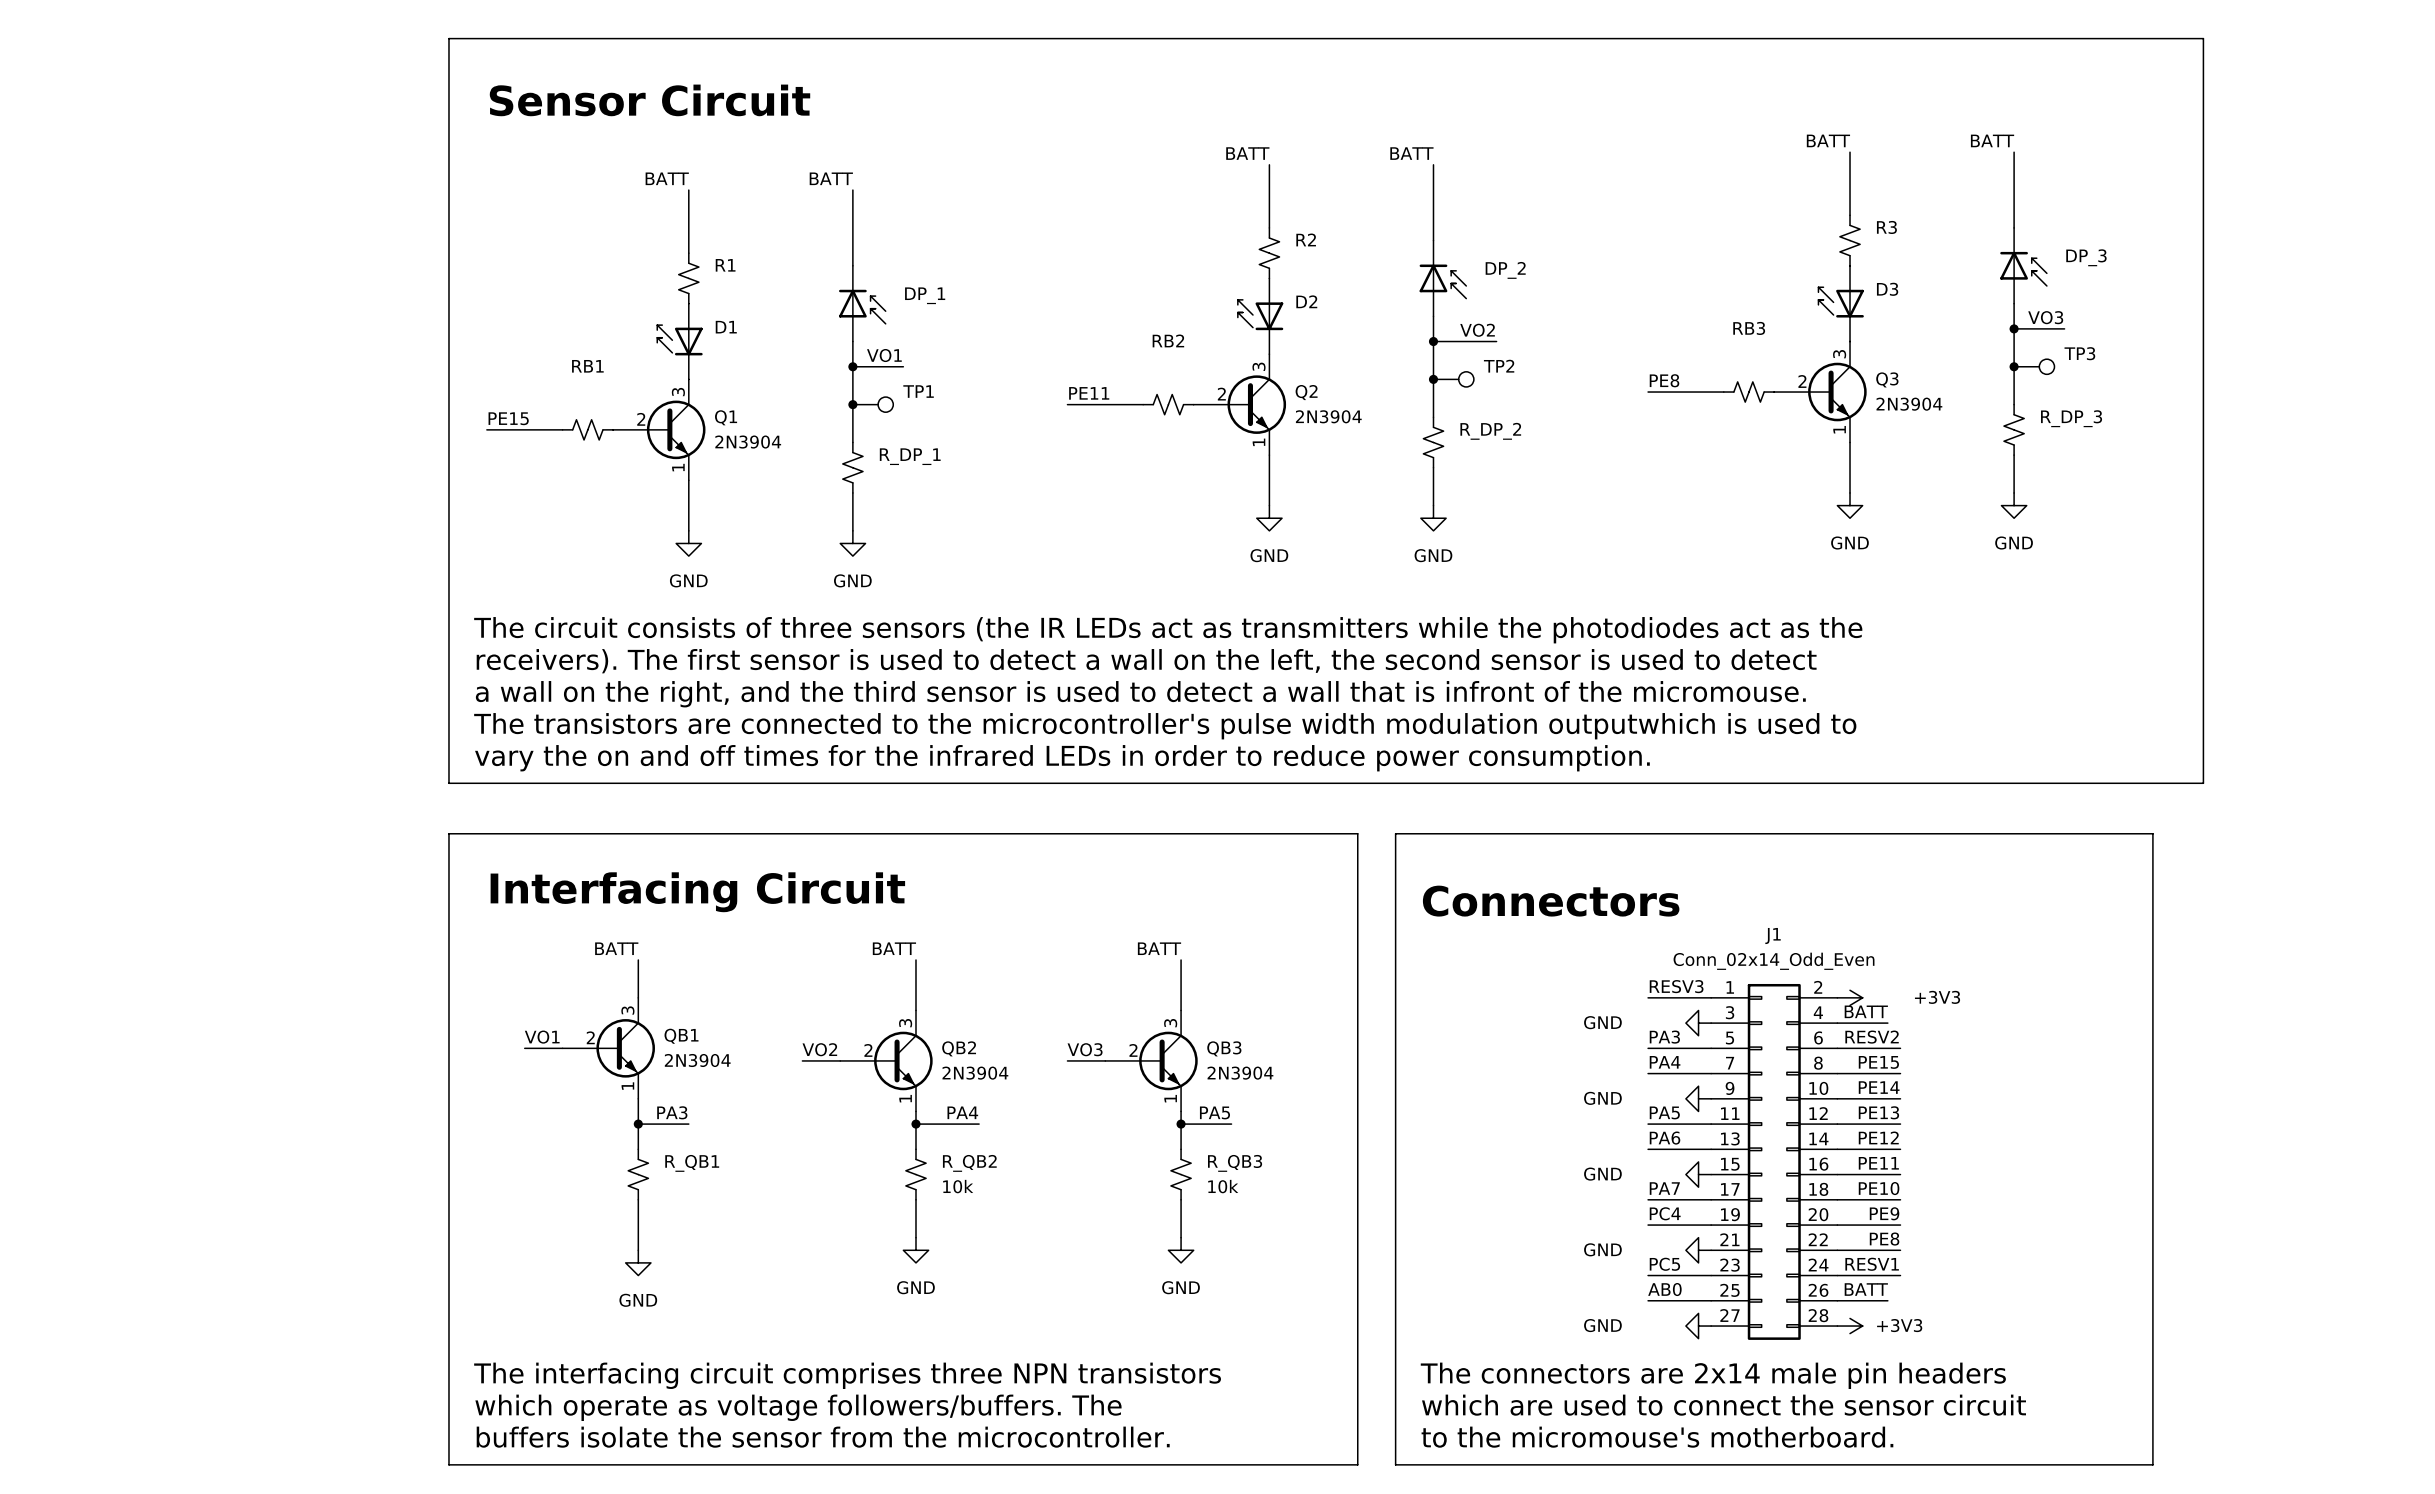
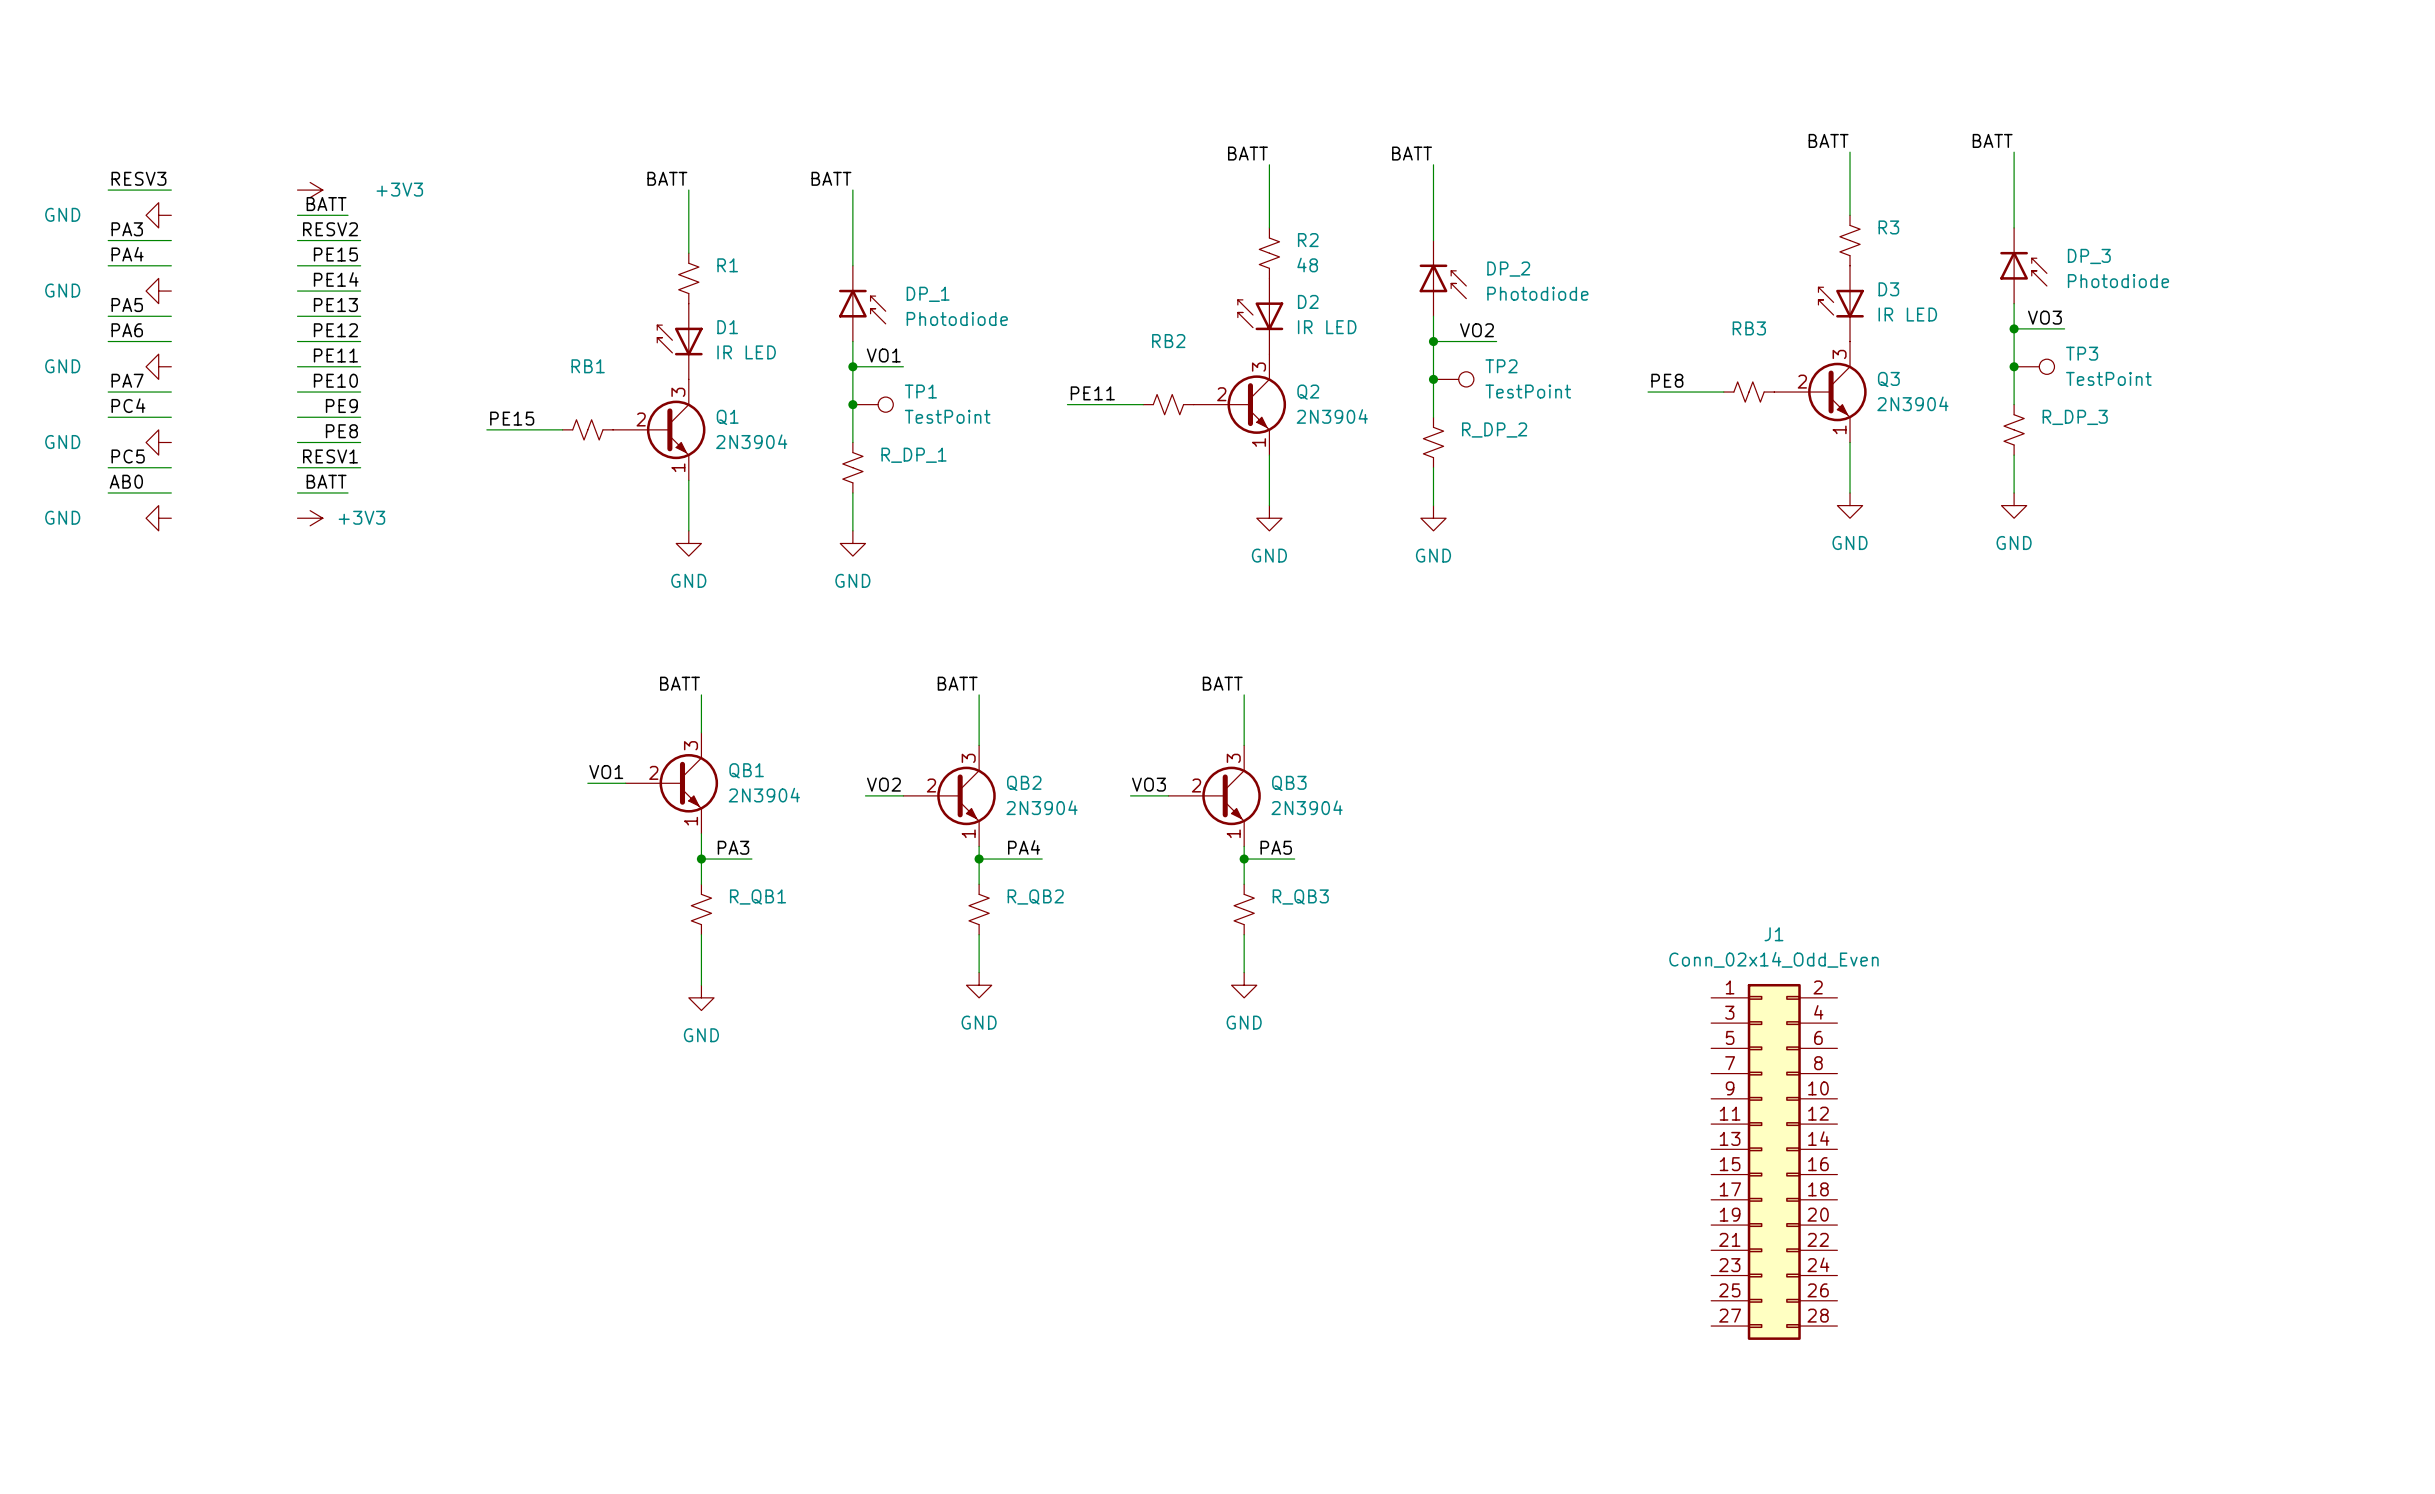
line: (448, 38) (2203, 38) (2203, 783) (448, 783) (448, 38) -> none
text: Sensor Circuit (649, 100) -> none
label: none -> RESV3 (138, 178)
wire: none -> (108, 190) (171, 190)
power symbol: none -> +3V3 (310, 190)
label: none -> BATT (326, 204)
power symbol: none -> GND (158, 215)
wire: none -> (297, 215) (348, 215)
label: none -> PA3 (127, 229)
label: none -> RESV2 (330, 229)
wire: none -> (108, 240) (171, 240)
wire: none -> (297, 240) (360, 240)
label: none -> PA4 (127, 254)
label: none -> PE15 (335, 254)
wire: none -> (108, 265) (171, 265)
wire: none -> (297, 265) (360, 265)
R2 value: none -> 48 (1307, 265)
label: none -> PE14 (336, 279)
DP_3 value: none -> Photodiode (2118, 281)
power symbol: none -> GND (158, 291)
wire: none -> (297, 291) (360, 291)
DP_2 value: none -> Photodiode (1537, 293)
label: none -> PA5 (127, 305)
label: none -> PE13 (335, 305)
D3 value: none -> IR LED (1907, 314)
wire: none -> (108, 316) (171, 316)
wire: none -> (297, 316) (360, 316)
DP_1 value: none -> Photodiode (957, 318)
D2 value: none -> IR LED (1327, 327)
label: none -> PA6 (127, 330)
label: none -> PE12 (335, 330)
wire: none -> (108, 341) (171, 341)
wire: none -> (297, 341) (360, 341)
D1 value: none -> IR LED (746, 352)
label: none -> PE11 (335, 355)
power symbol: none -> GND (158, 366)
wire: none -> (297, 366) (360, 366)
TP3 value: none -> TestPoint (2108, 378)
label: none -> PA7 (127, 380)
label: none -> PE10 (335, 380)
TP2 value: none -> TestPoint (1528, 391)
wire: none -> (108, 392) (171, 392)
wire: none -> (297, 392) (360, 392)
label: none -> PC4 (128, 405)
label: none -> PE9 (341, 405)
TP1 value: none -> TestPoint (947, 416)
wire: none -> (108, 417) (171, 417)
wire: none -> (297, 417) (360, 417)
label: none -> PE8 (341, 431)
power symbol: none -> GND (158, 442)
wire: none -> (297, 442) (360, 442)
label: none -> PC5 (128, 456)
label: none -> RESV1 (330, 456)
wire: none -> (108, 467) (171, 467)
wire: none -> (297, 467) (360, 467)
label: none -> AB0 (126, 481)
label: none -> BATT (326, 481)
wire: none -> (108, 492) (171, 492)
wire: none -> (297, 492) (348, 492)
power symbol: none -> GND (158, 518)
power symbol: none -> +3V3 (310, 518)
text: The circuit consists of three sensors (the IR LEDs act as transmitters while the photodiodes act as the (1168, 630) -> none
text: receivers). The first sensor is used to detect a wall on the left, the second sensor is used to detect (1146, 661) -> none
label: none -> BATT (679, 683)
label: none -> BATT (957, 683)
label: none -> BATT (1222, 683)
wire: none -> (701, 694) (701, 732)
wire: none -> (979, 694) (979, 745)
text: a wall on the right, and the third sensor is used to detect a wall that is infront of the micromouse. (1140, 694) -> none
wire: none -> (1244, 694) (1244, 745)
text: The transistors are connected to the microcontroller's pulse width modulation outputwhich is used to (1165, 726) -> none
text: vary the on and off times for the infrared LEDs in order to reduce power consumption. (1062, 758) -> none
label: none -> VO1 (606, 772)
label: none -> VO2 (883, 784)
label: none -> VO3 (1148, 784)
wire: none -> (865, 795) (903, 795)
wire: none -> (1130, 795) (1168, 795)
line: (448, 833) (1357, 833) (1357, 1464) (448, 1464) (448, 833) -> none
wire: none -> (701, 833) (701, 884)
line: (1395, 833) (2152, 833) (2152, 1464) (1395, 1464) (1395, 833) -> none
wire: none -> (979, 846) (979, 884)
wire: none -> (1244, 846) (1244, 884)
label: none -> PA3 (733, 847)
label: none -> PA4 (1024, 847)
label: none -> PA5 (1276, 847)
wire: none -> (701, 859) (751, 859)
junction: none -> (701, 859)
wire: none -> (979, 859) (1042, 859)
junction: none -> (979, 859)
wire: none -> (1244, 859) (1294, 859)
junction: none -> (1244, 859)
text: Interfacing Circuit (697, 892) -> none
text: Connectors (1551, 901) -> none
label: BATT (616, 948) -> none
label: BATT (894, 948) -> none
label: BATT (1159, 948) -> none
wire: (638, 959) (638, 997) -> none
wire: (915, 959) (915, 1010) -> none
wire: (1181, 959) (1181, 1010) -> none
power symbol: none -> GND (979, 985)
power symbol: none -> GND (1244, 985)
label: RESV3 (1676, 986) -> none
power symbol: none -> GND (701, 997)
wire: (1648, 997) (1711, 997) -> none
power symbol: +3V3 (1850, 997) -> none
label: BATT (1866, 1011) -> none
power symbol: GND (1698, 1023) -> none
wire: (1837, 1023) (1887, 1023) -> none
label: VO1 (542, 1037) -> none
label: PA3 (1664, 1037) -> none
label: RESV2 (1872, 1037) -> none
wire: (524, 1048) (562, 1048) -> none
QB1 position: (608, 1048) -> (671, 783)
wire: (1648, 1048) (1711, 1048) -> none
wire: (1837, 1048) (1900, 1048) -> none
label: VO2 (819, 1049) -> none
label: VO3 (1085, 1049) -> none
wire: (802, 1060) (840, 1060) -> none
QB2 position: (886, 1060) -> (949, 795)
wire: (1067, 1060) (1105, 1060) -> none
QB3 position: (1151, 1060) -> (1214, 795)
label: PA4 (1665, 1062) -> none
label: PE15 (1878, 1062) -> none
wire: (1648, 1073) (1711, 1073) -> none
wire: (1837, 1073) (1900, 1073) -> none
label: PE14 (1879, 1087) -> none
wire: (638, 1098) (638, 1149) -> (701, 934) (701, 985)
power symbol: GND (1698, 1098) -> none
wire: (1837, 1098) (1900, 1098) -> none
wire: (915, 1111) (915, 1149) -> (979, 934) (979, 972)
wire: (1181, 1111) (1181, 1149) -> (1244, 934) (1244, 972)
label: PA3 (672, 1112) -> none
label: PA4 (962, 1112) -> none
label: PA5 (1214, 1112) -> none
label: PA5 (1664, 1112) -> none
label: PE13 (1878, 1112) -> none
wire: (638, 1124) (688, 1124) -> none
junction: (638, 1124) -> none
wire: (915, 1124) (979, 1124) -> none
junction: (915, 1124) -> none
wire: (1181, 1124) (1231, 1124) -> none
junction: (1181, 1124) -> none
wire: (1648, 1124) (1711, 1124) -> none
wire: (1837, 1124) (1900, 1124) -> none
label: PE12 (1878, 1137) -> none
label: PA6 (1665, 1138) -> none
wire: (1648, 1149) (1711, 1149) -> none
wire: (1837, 1149) (1900, 1149) -> none
label: PE11 (1878, 1163) -> none
R_QB1 position: (638, 1174) -> (701, 909)
R_QB2 position: (915, 1174) -> (979, 909)
R_QB3 position: (1181, 1174) -> (1244, 909)
power symbol: GND (1698, 1174) -> none
wire: (1837, 1174) (1900, 1174) -> none
R_QB2 value: 10k (958, 1186) -> none
R_QB3 value: 10k (1223, 1186) -> none
label: PA7 (1664, 1188) -> none
label: PE10 (1879, 1188) -> none
wire: (638, 1199) (638, 1250) -> none
wire: (915, 1199) (915, 1237) -> none
wire: (1181, 1199) (1181, 1237) -> none
wire: (1648, 1199) (1711, 1199) -> none
wire: (1837, 1199) (1900, 1199) -> none
label: PC4 (1665, 1213) -> none
label: PE9 (1884, 1213) -> none
wire: (1648, 1225) (1711, 1225) -> none
wire: (1837, 1225) (1900, 1225) -> none
label: PE8 (1884, 1239) -> none
power symbol: GND (915, 1250) -> none
power symbol: GND (1181, 1250) -> none
power symbol: GND (1698, 1250) -> none
wire: (1837, 1250) (1900, 1250) -> none
power symbol: GND (638, 1262) -> none
label: PC5 (1664, 1264) -> none
label: RESV1 (1872, 1264) -> none
wire: (1648, 1275) (1711, 1275) -> none
wire: (1837, 1275) (1900, 1275) -> none
label: AB0 (1664, 1289) -> none
label: BATT (1866, 1289) -> none
wire: (1648, 1300) (1711, 1300) -> none
wire: (1837, 1300) (1887, 1300) -> none
power symbol: GND (1698, 1326) -> none
power symbol: +3V3 (1850, 1326) -> none
text: The interfacing circuit comprises three NPN transistors (847, 1375) -> none
text: The connectors are 2x14 male pin headers (1713, 1375) -> none
text: which are used to connect the sensor circuit (1724, 1405) -> none
text: which operate as voltage followers/buffers. The (798, 1407) -> none
text: buffers isolate the sensor from the microcontroller. (823, 1437) -> none
text: to the micromouse's motherboard. (1657, 1437) -> none

